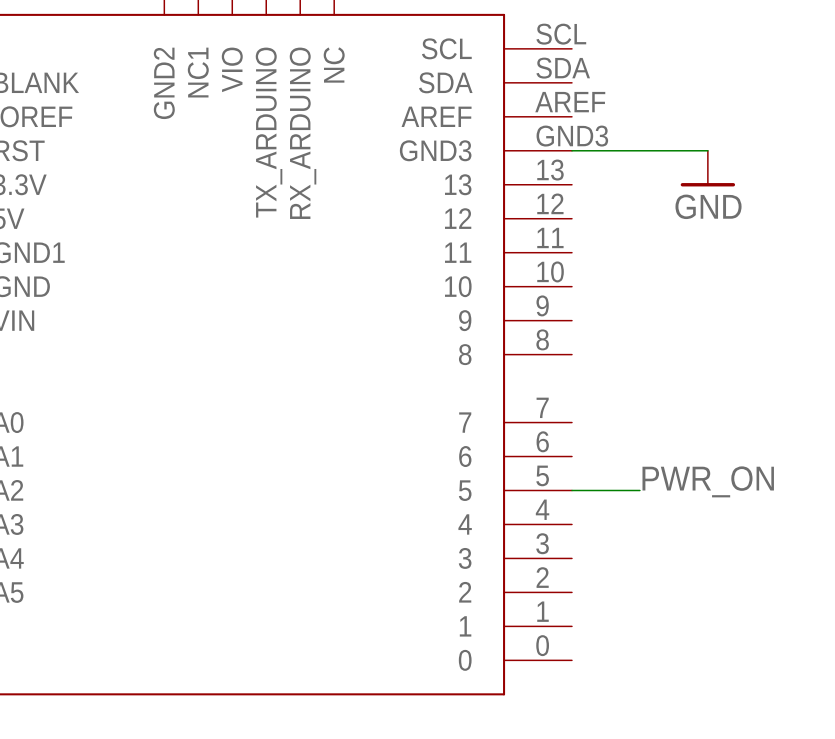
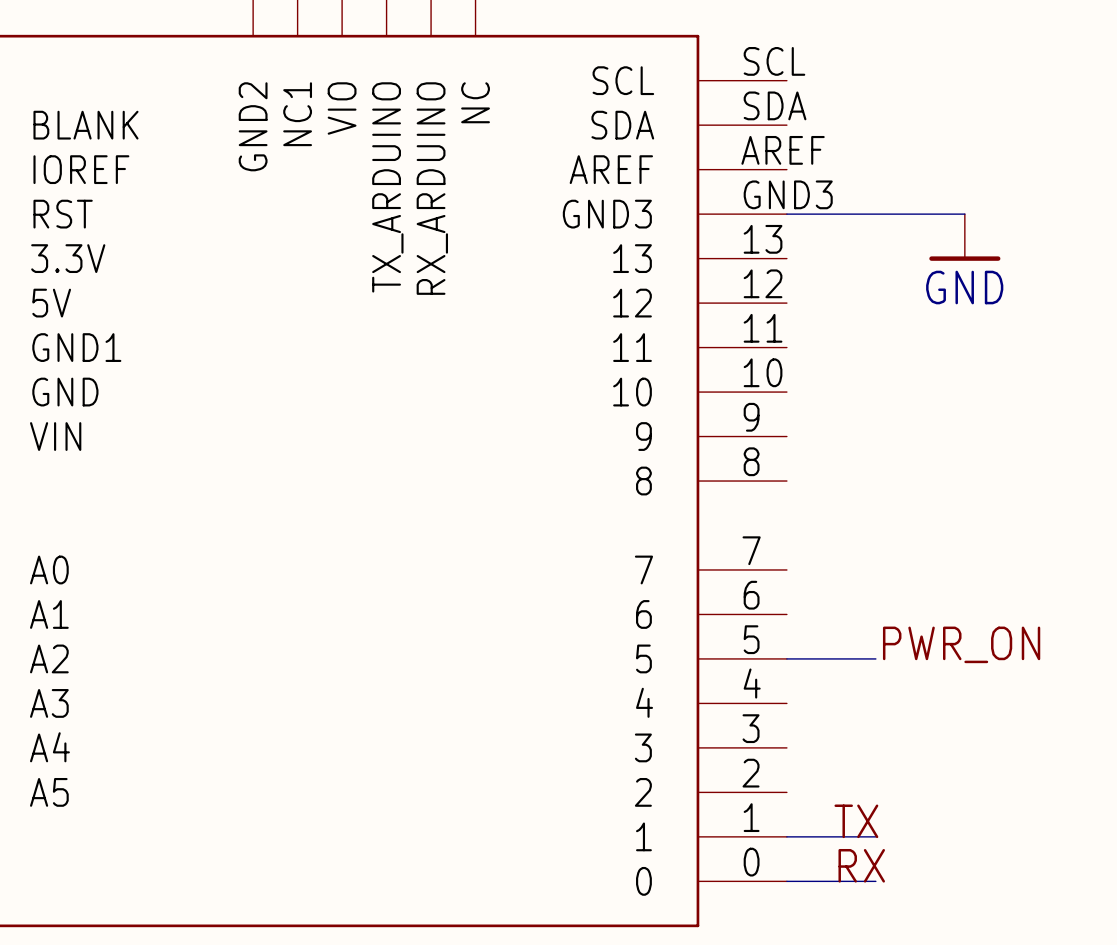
label: none -> TX (856, 821)
wire: none -> (786, 836) (875, 836)
label: none -> RX (861, 865)
wire: none -> (786, 881) (875, 881)

